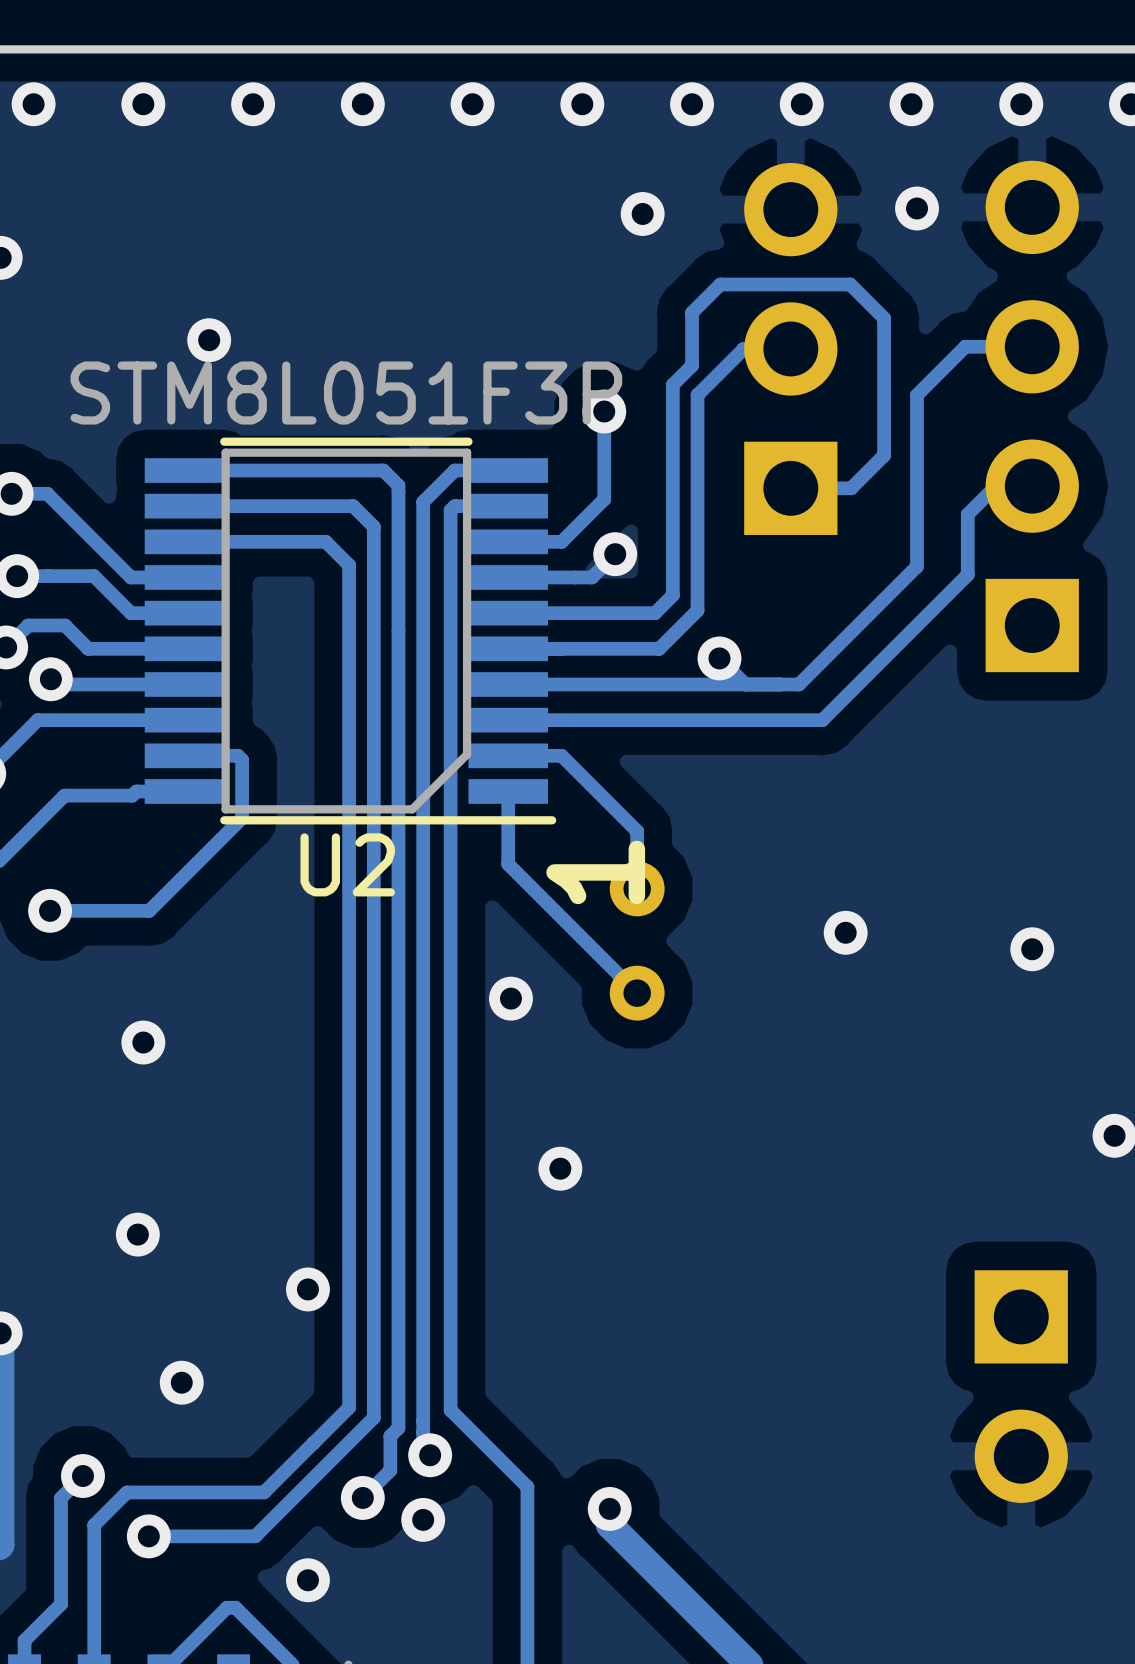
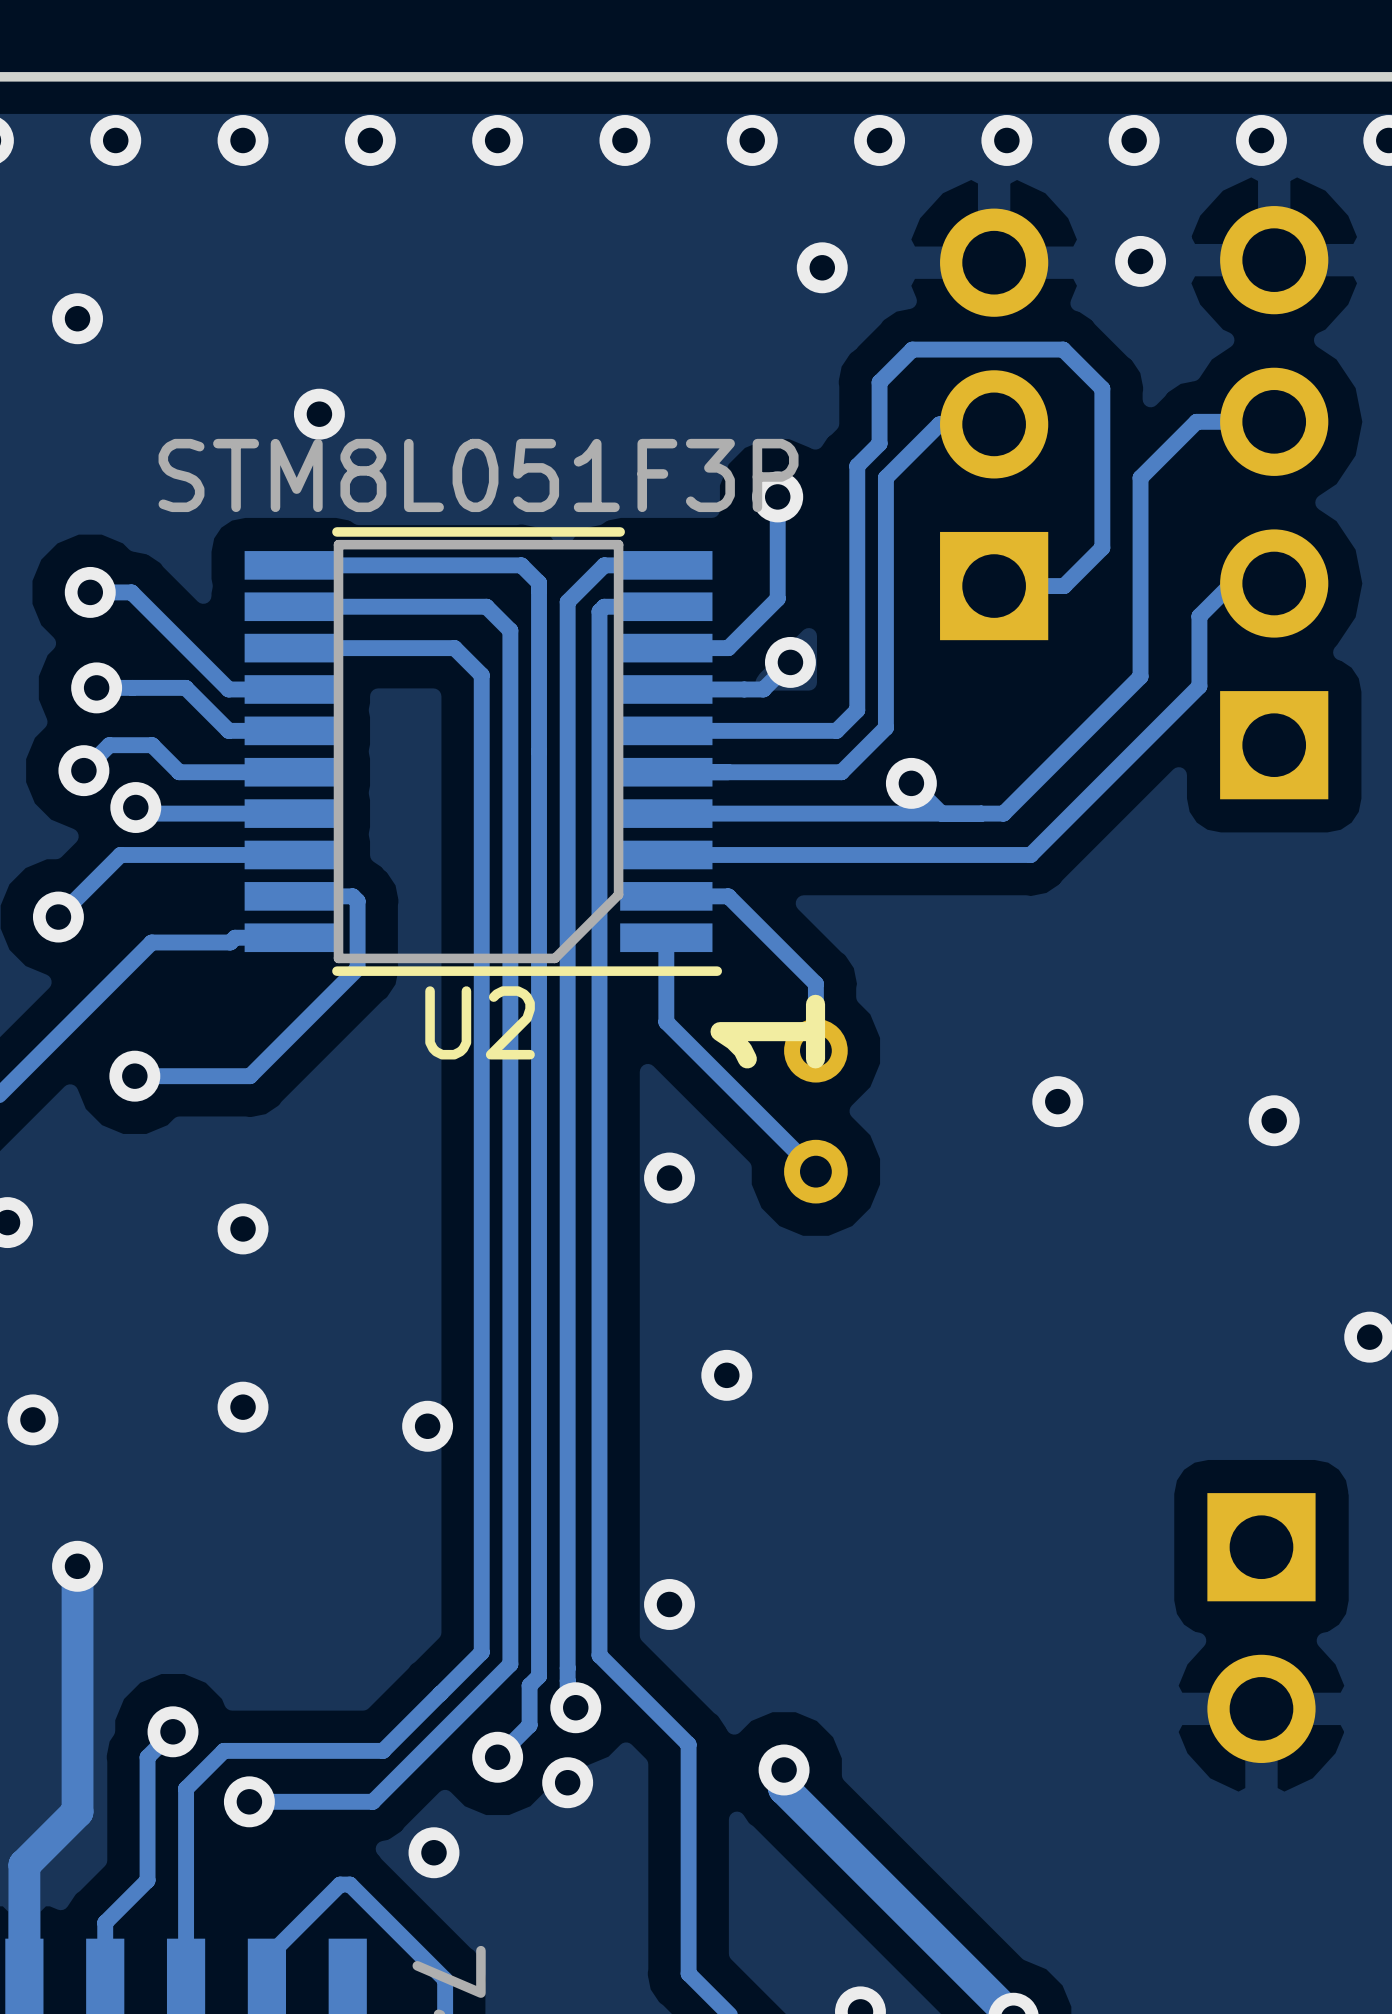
via position: (137, 1234) -> (243, 1407)
via position: (307, 1289) -> (427, 1426)
via: none -> (669, 1604)
via: (181, 1382) -> none

